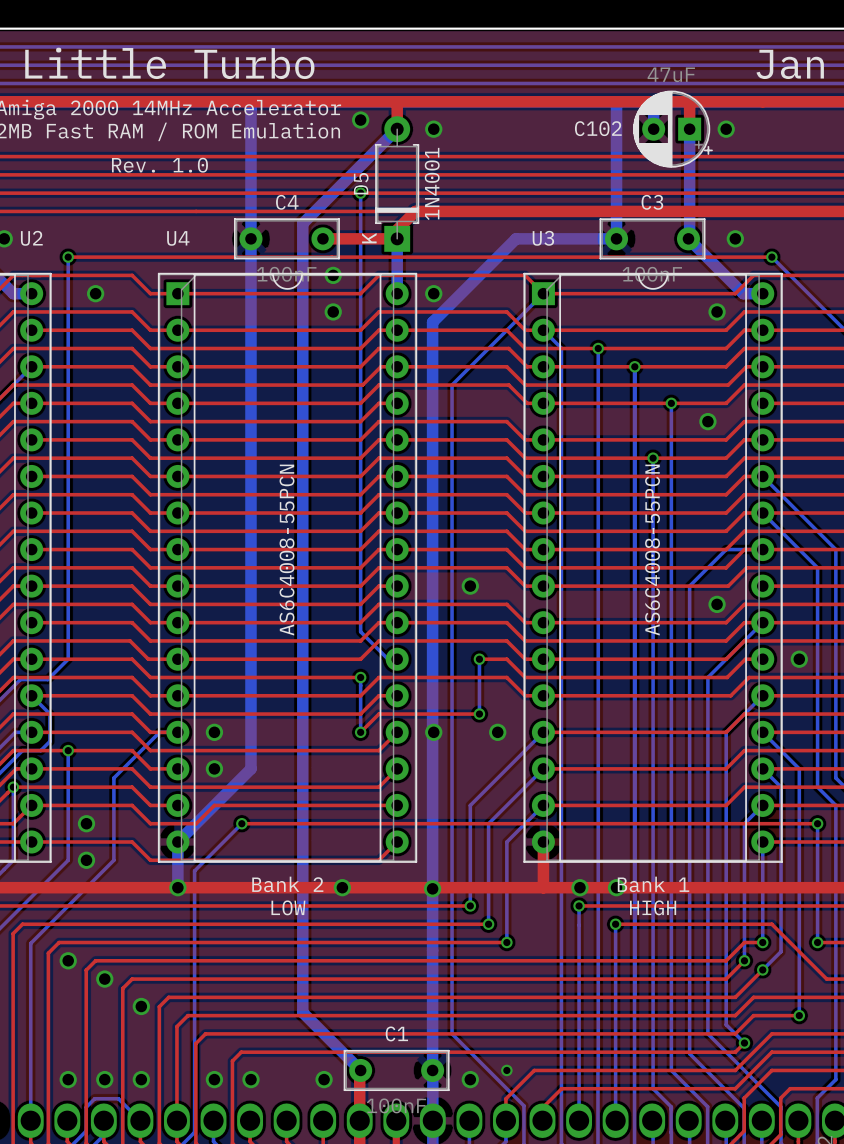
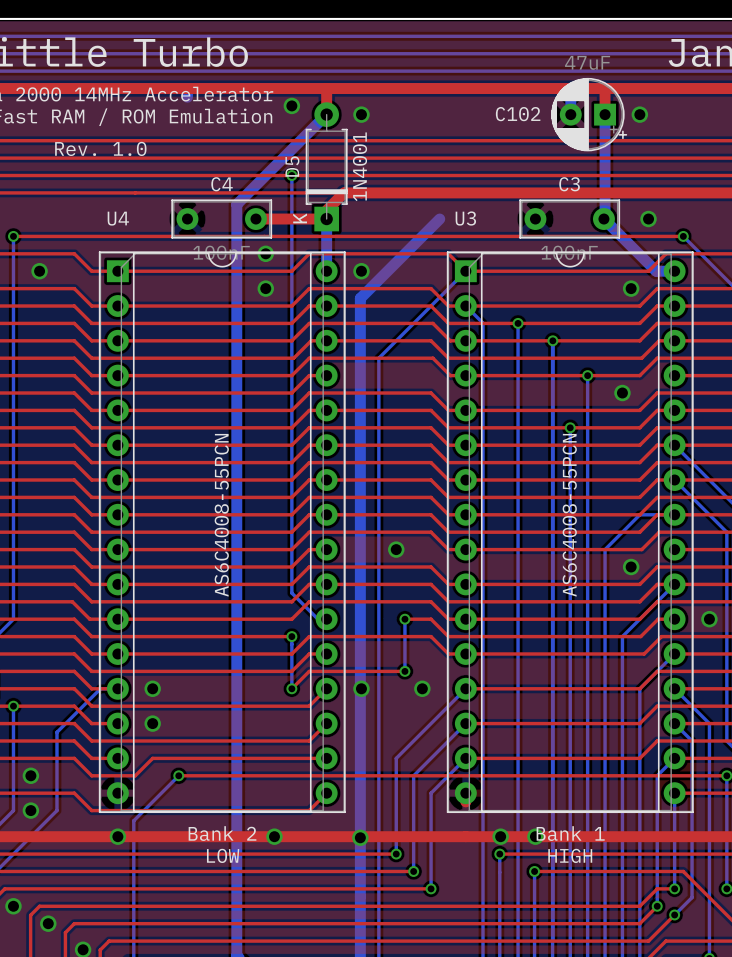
bottom track: (616, 101) (616, 238) (516, 238) -> none
bottom track: (250, 110) (250, 768) (177, 841) (177, 887) -> none
top track: (543, 851) (543, 887) -> none

